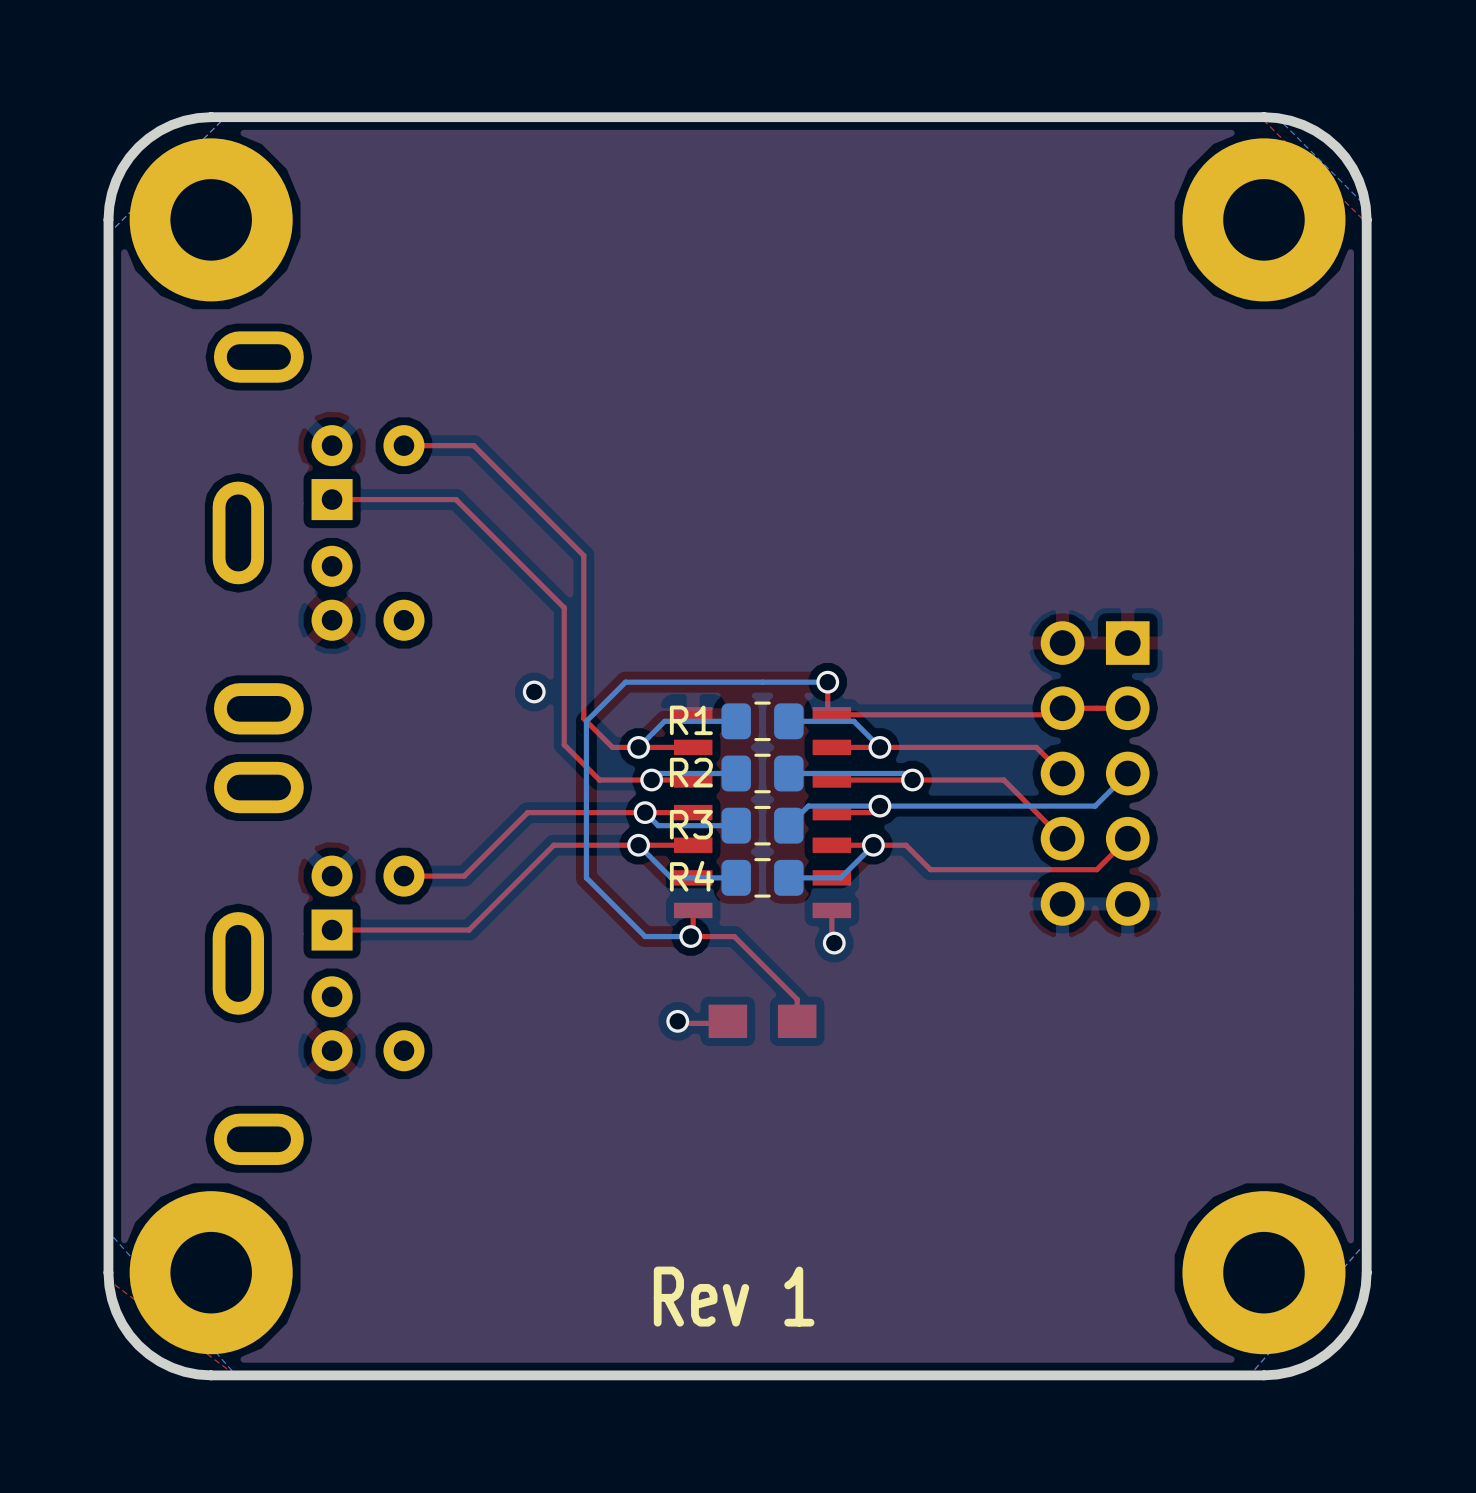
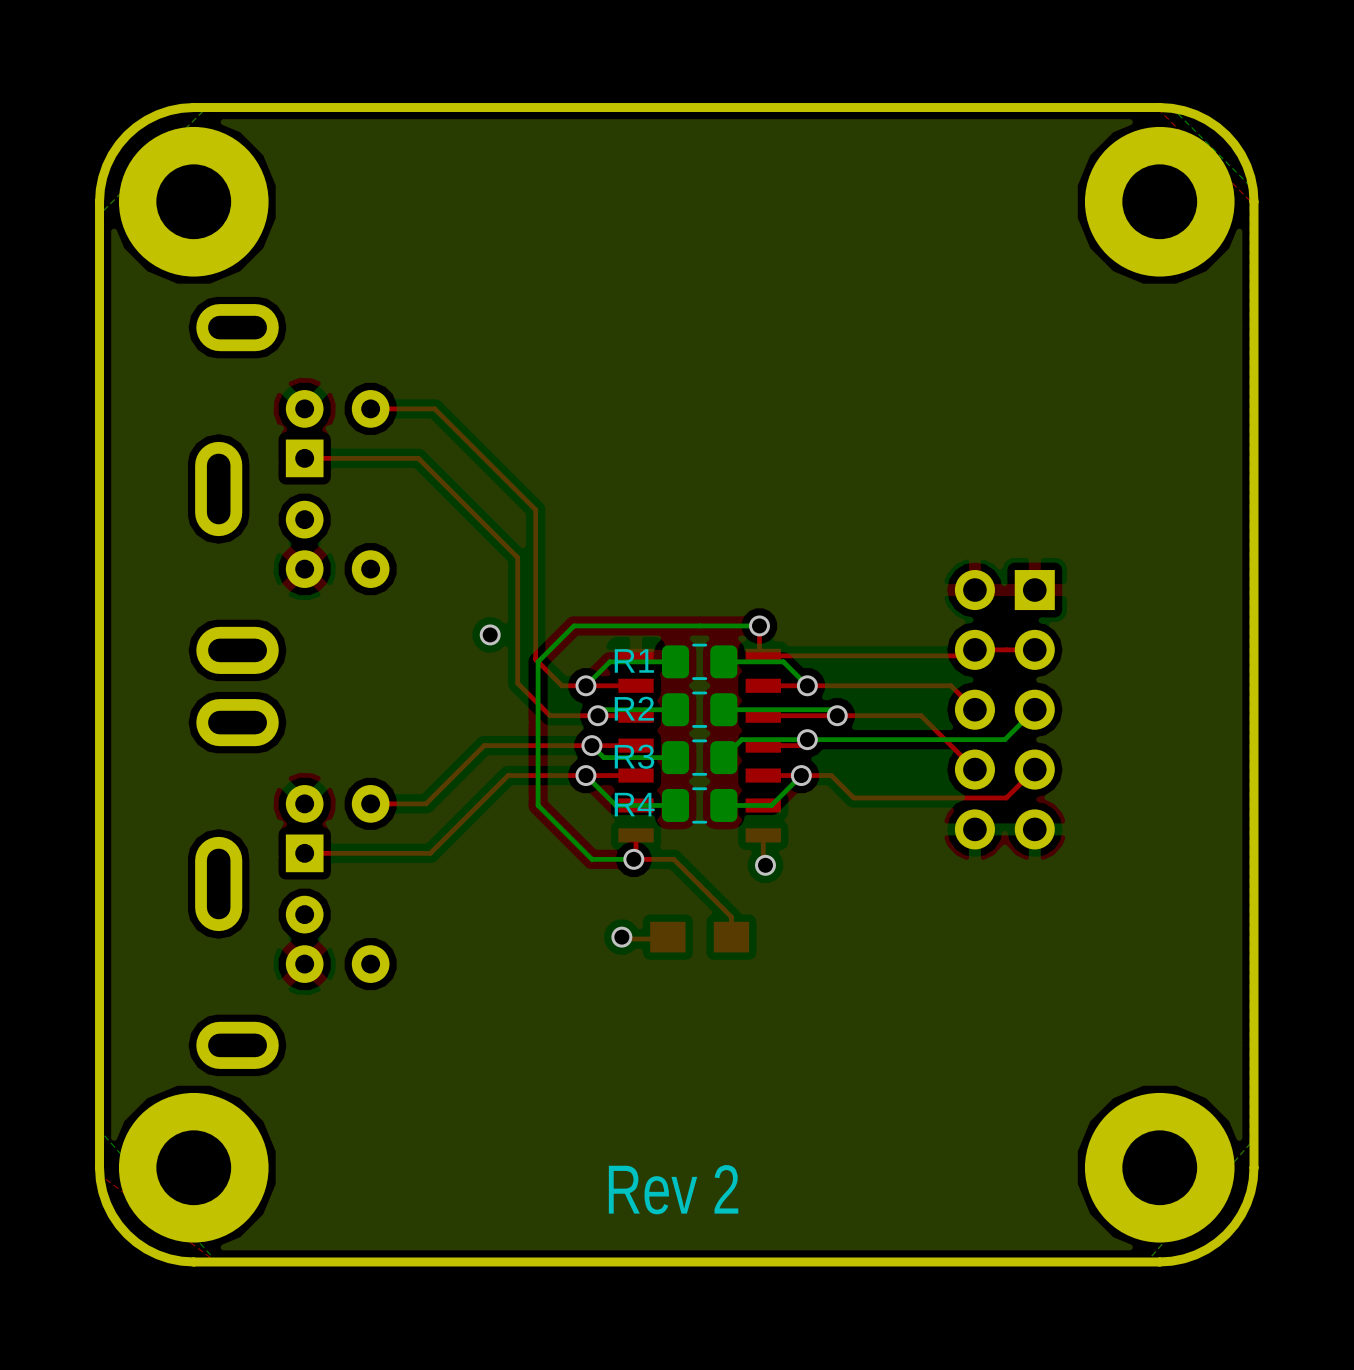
text: Rev 1 (734, 1296) -> Rev 2 (673, 1189)

